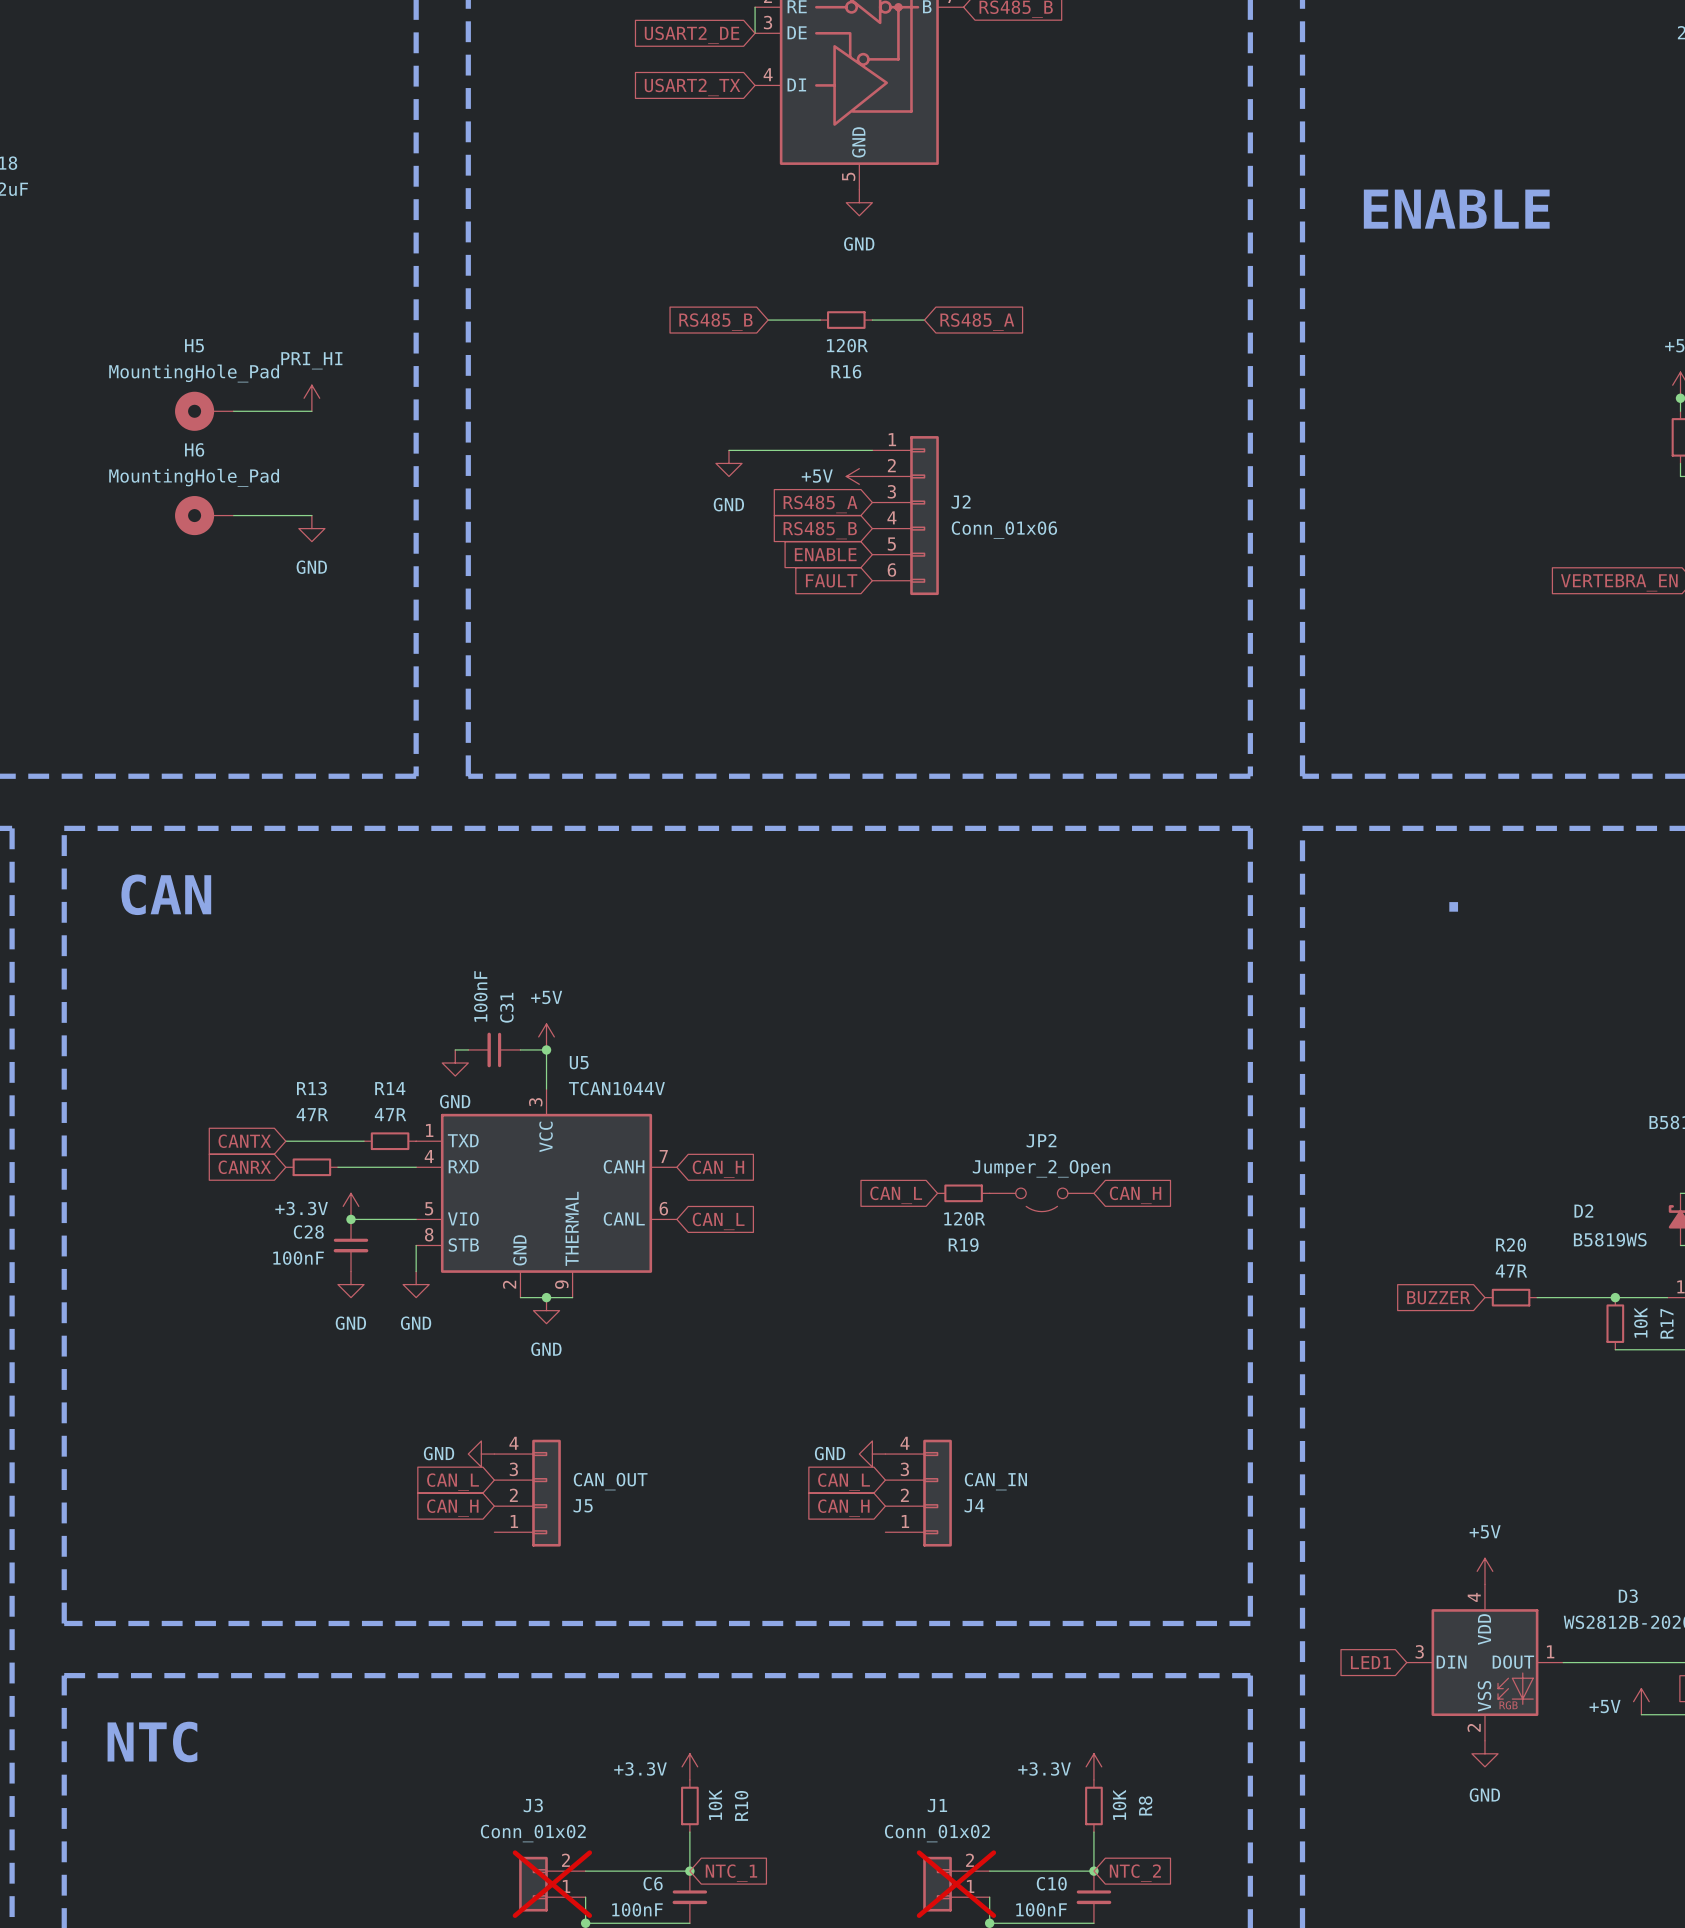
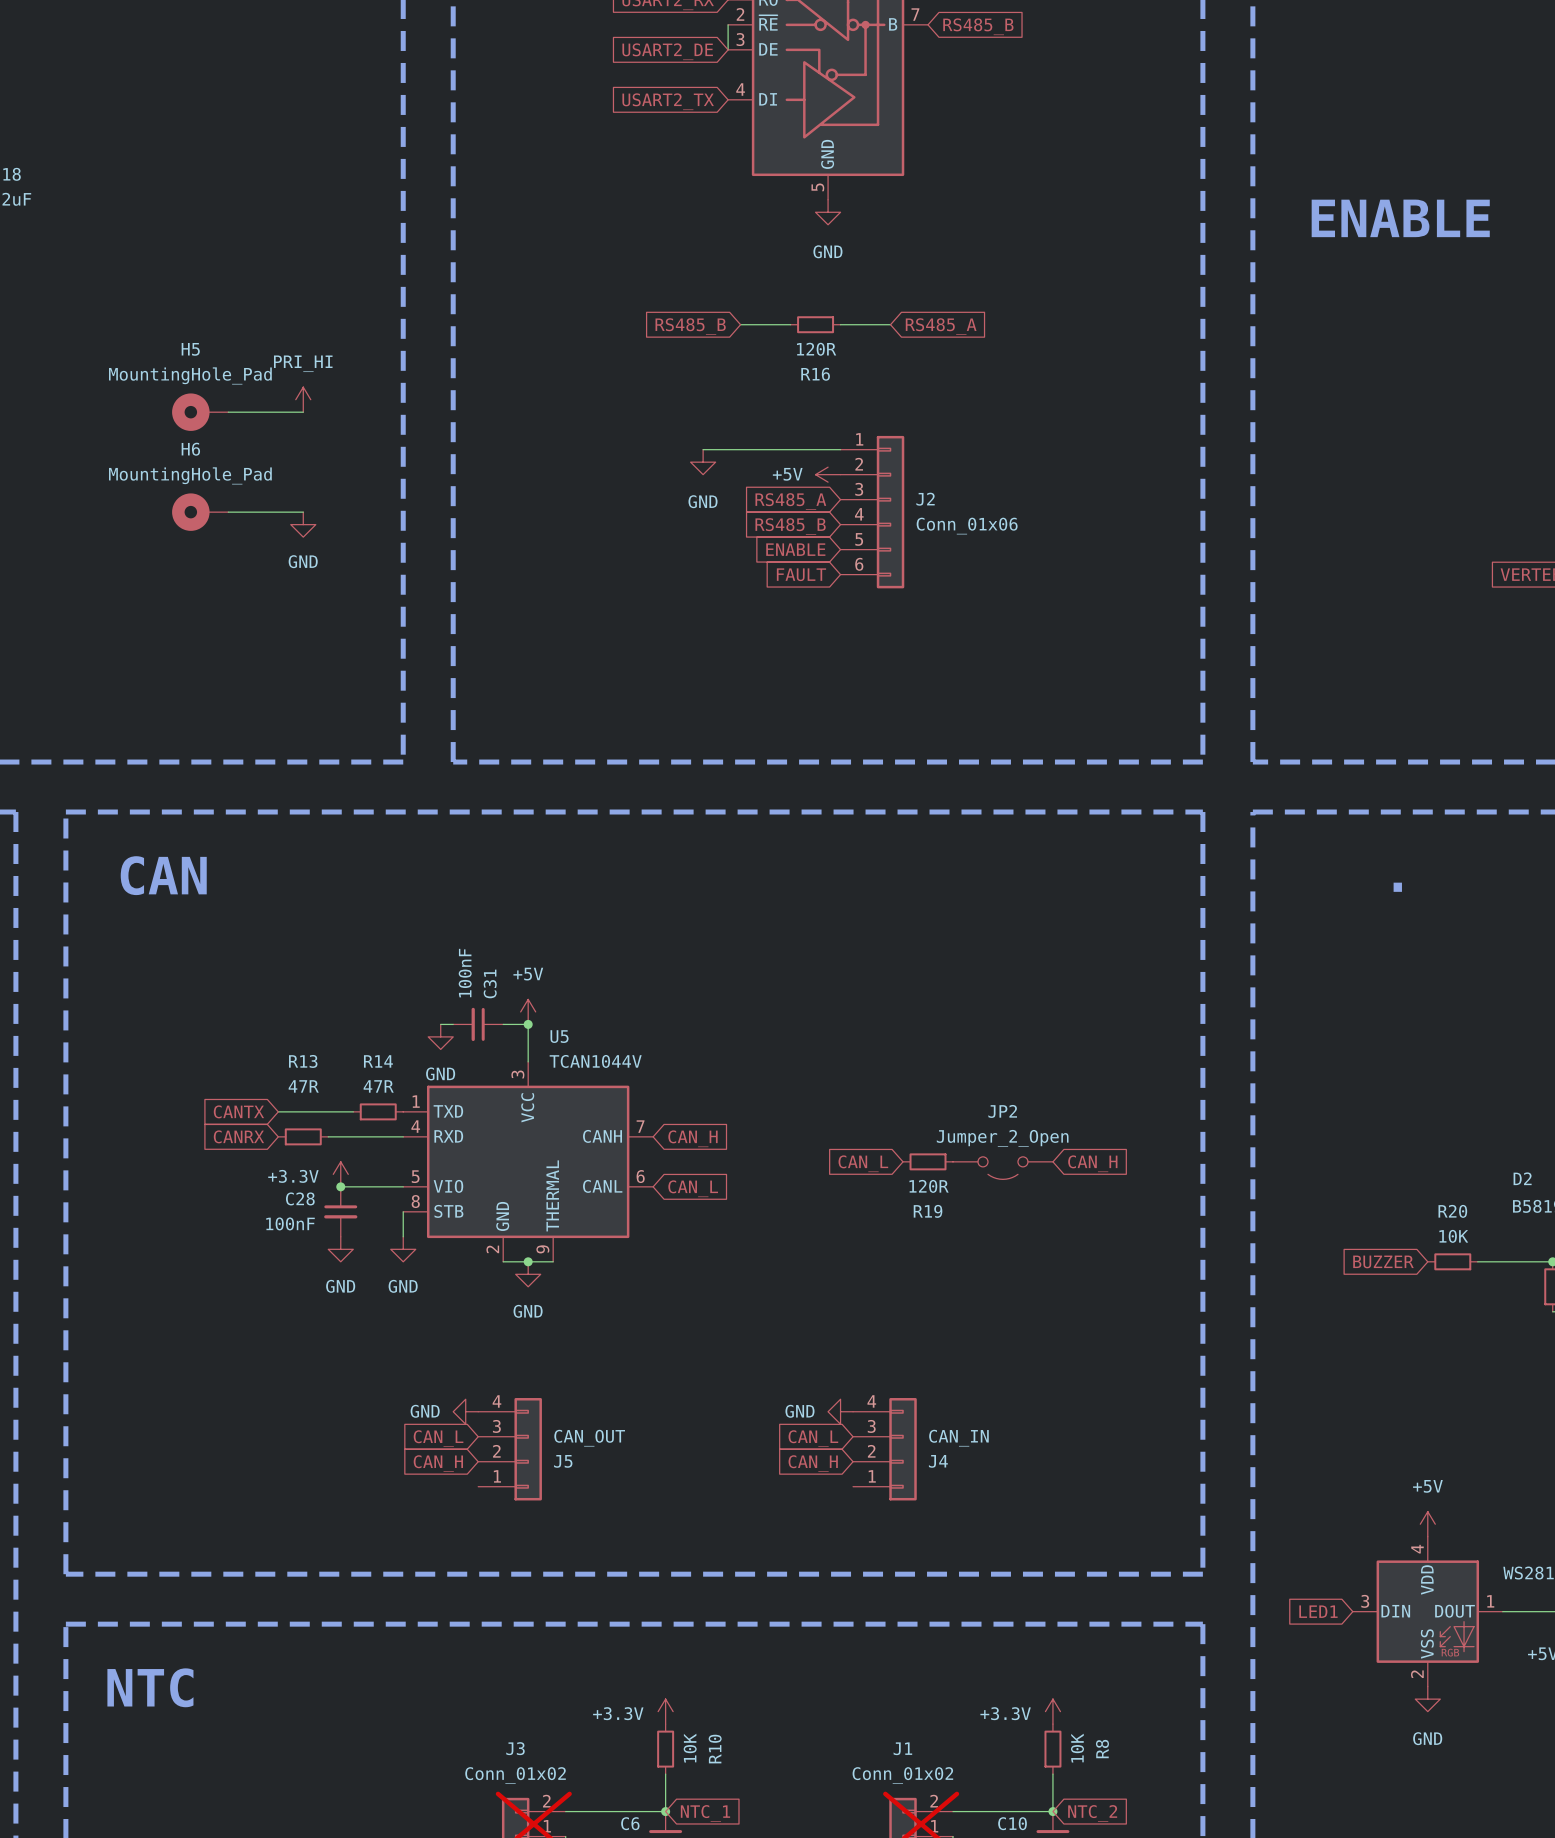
R20 value: 47R (1511, 1271) -> 10K (1453, 1236)

